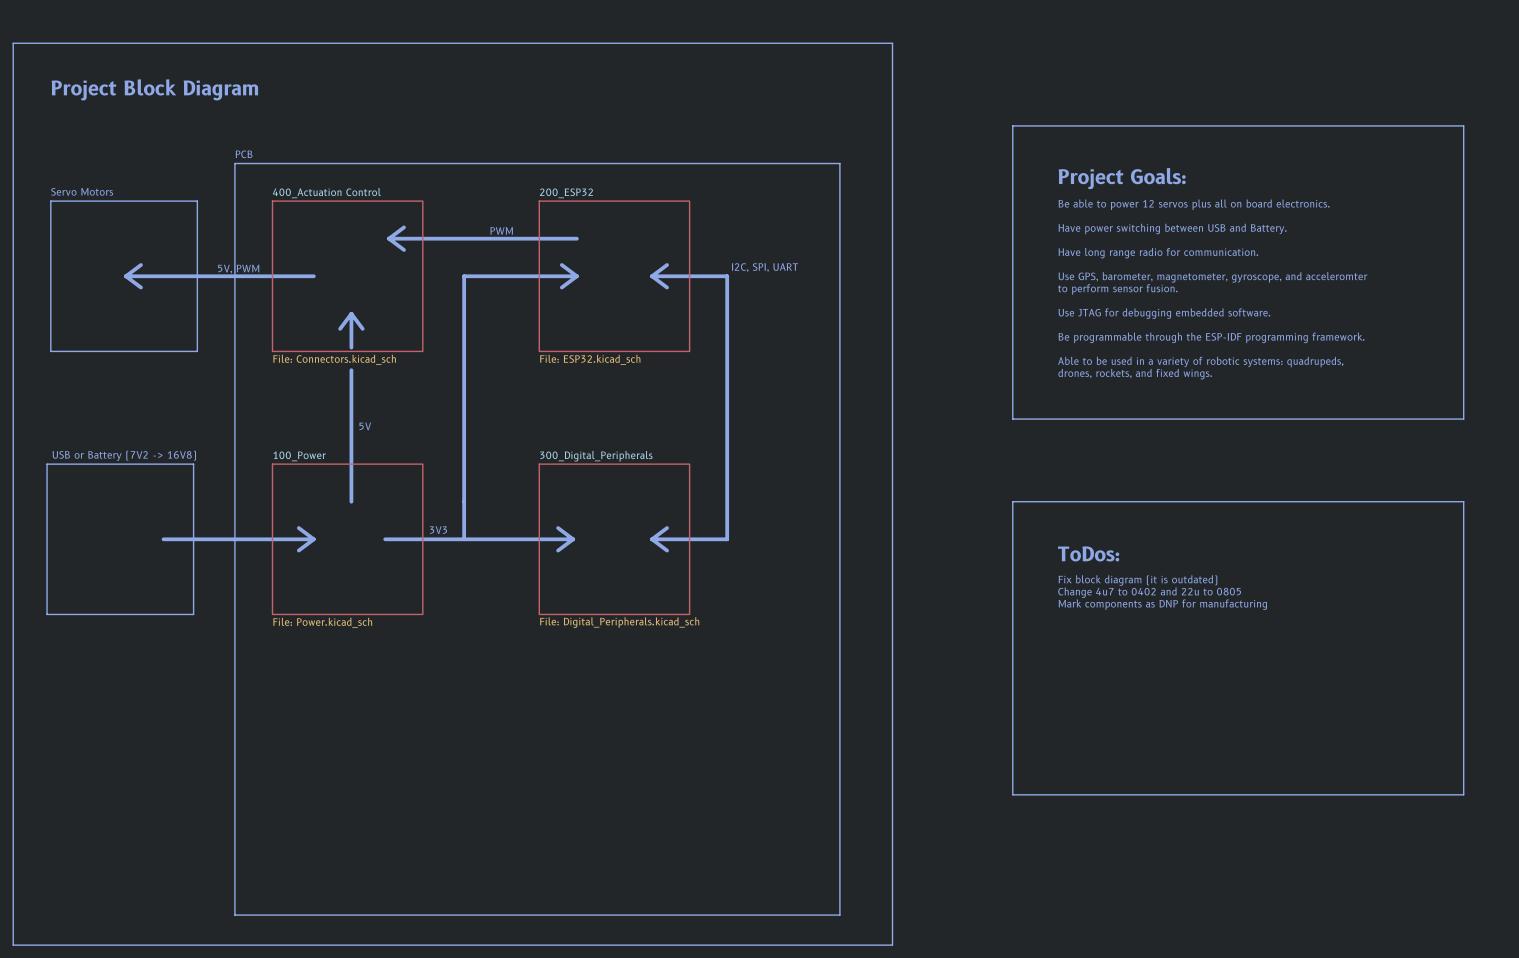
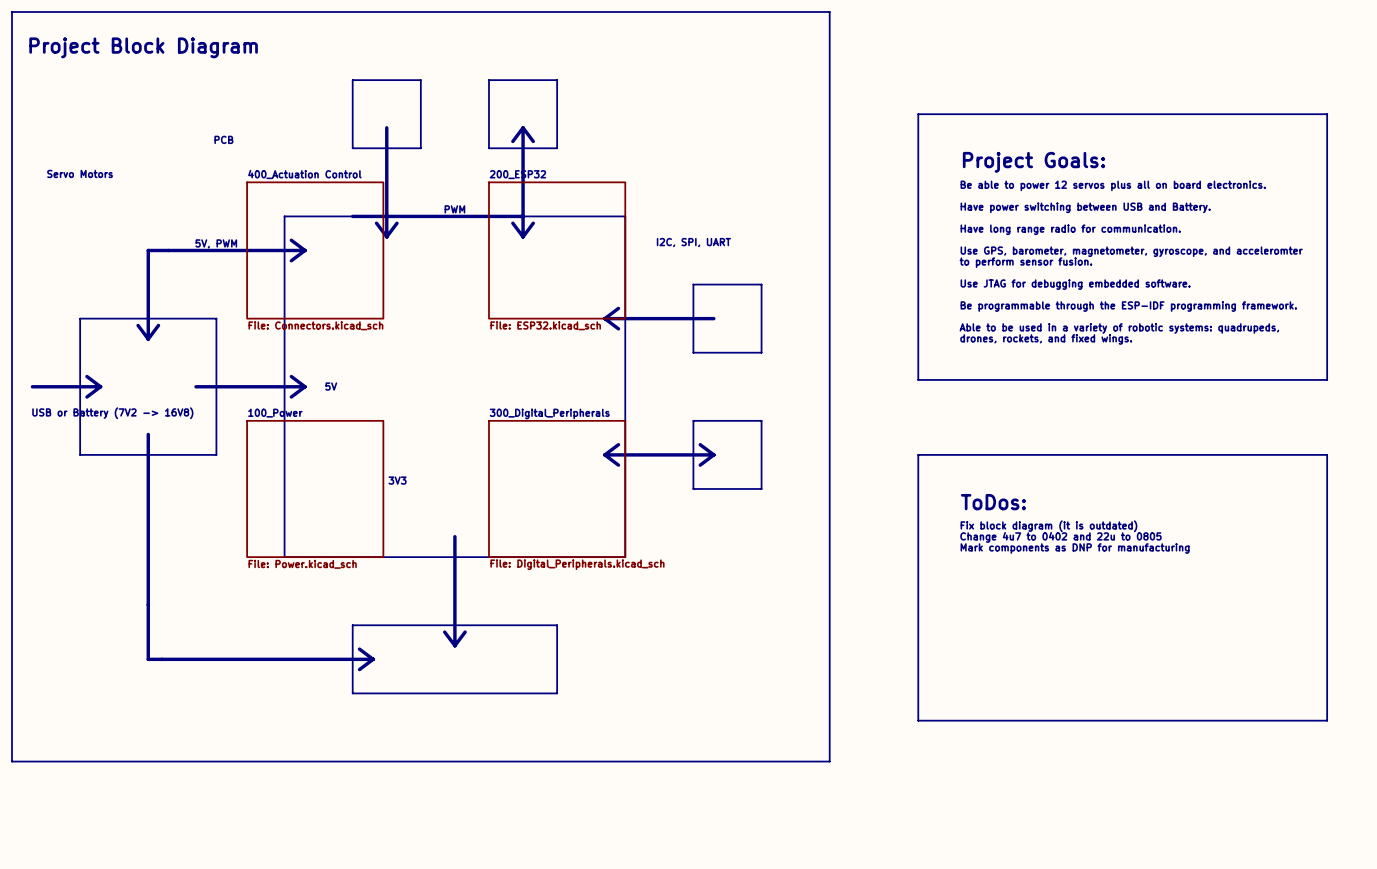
line: (13, 43) (892, 43) (892, 945) (13, 945) (13, 839) -> (11, 39) (11, 11) (829, 11) (829, 761) (11, 761)
text position: Project Block Diagram (154, 89) -> Project Block Diagram (143, 47)
line: none -> (386, 127) (386, 236)
line: none -> (523, 127) (512, 141)
line: none -> (523, 127) (533, 141)
line: none -> (523, 127) (523, 236)
line: (388, 163) (234, 163) (234, 915) (839, 915) (839, 539) -> (761, 420) (693, 420) (693, 488) (761, 488)
line: (464, 163) (539, 163) -> (420, 148) (420, 80) (352, 80) (352, 148)
line: (614, 163) (839, 163) (839, 313) -> (557, 148) (557, 80) (488, 80) (488, 148)
line: (404, 227) (388, 238) (404, 249) -> none
line: none -> (352, 216) (284, 216) (284, 557) (625, 557) (625, 216) (523, 216)
line: none -> (512, 223) (523, 236)
line: none -> (533, 223) (523, 236)
line: (140, 264) (125, 276) -> none
line: none -> (291, 240) (305, 250)
line: (561, 264) (576, 276) -> none
line: (667, 264) (652, 276) -> (618, 308) (604, 318)
line: (125, 276) (163, 276) -> (148, 339) (148, 250)
line: (125, 276) (140, 287) -> (86, 376) (100, 386)
line: none -> (284, 250) (305, 250)
line: none -> (305, 250) (291, 260)
line: (576, 276) (464, 276) (464, 539) -> none
line: (576, 276) (561, 287) -> none
line: (652, 276) (667, 287) -> (604, 318) (618, 328)
line: (652, 276) (727, 276) (727, 539) (652, 539) -> none
line: (351, 313) (362, 328) -> (376, 223) (386, 236)
line: (351, 313) (340, 328) -> (396, 223) (386, 236)
line: (351, 313) (351, 347) -> none
line: (88, 351) (50, 351) (50, 201) (197, 201) (197, 351) -> (80, 318) (80, 454) (216, 454) (216, 318) (178, 318)
line: none -> (604, 318) (713, 318)
line: none -> (138, 325) (148, 339)
line: none -> (158, 325) (148, 339)
line: (351, 370) (351, 501) -> none
line: (839, 388) (839, 464) -> (761, 352) (693, 352) (693, 284) (761, 284)
line: none -> (291, 376) (305, 386)
line: none -> (32, 386) (100, 386)
line: none -> (100, 386) (86, 396)
line: none -> (195, 386) (305, 386)
line: none -> (305, 386) (291, 396)
line: (47, 464) (193, 464) (193, 614) (47, 614) (47, 464) -> none
line: none -> (148, 434) (148, 659) (373, 659)
line: none -> (700, 444) (713, 454)
line: none -> (604, 454) (713, 454)
line: none -> (713, 454) (700, 465)
line: (298, 528) (313, 539) (298, 550) -> none
line: (558, 528) (573, 539) -> none
line: (667, 528) (652, 539) -> (618, 444) (604, 454)
line: (163, 539) (310, 539) -> none
line: (385, 539) (573, 539) -> none
line: (573, 539) (558, 550) -> none
line: (652, 539) (667, 550) -> (604, 454) (618, 465)
line: none -> (454, 536) (454, 645)
line: none -> (352, 625) (557, 625) (557, 693) (352, 693) (352, 625)
line: none -> (444, 632) (454, 645)
line: none -> (465, 632) (454, 645)
line: none -> (359, 649) (373, 659)
line: none -> (373, 659) (359, 669)

